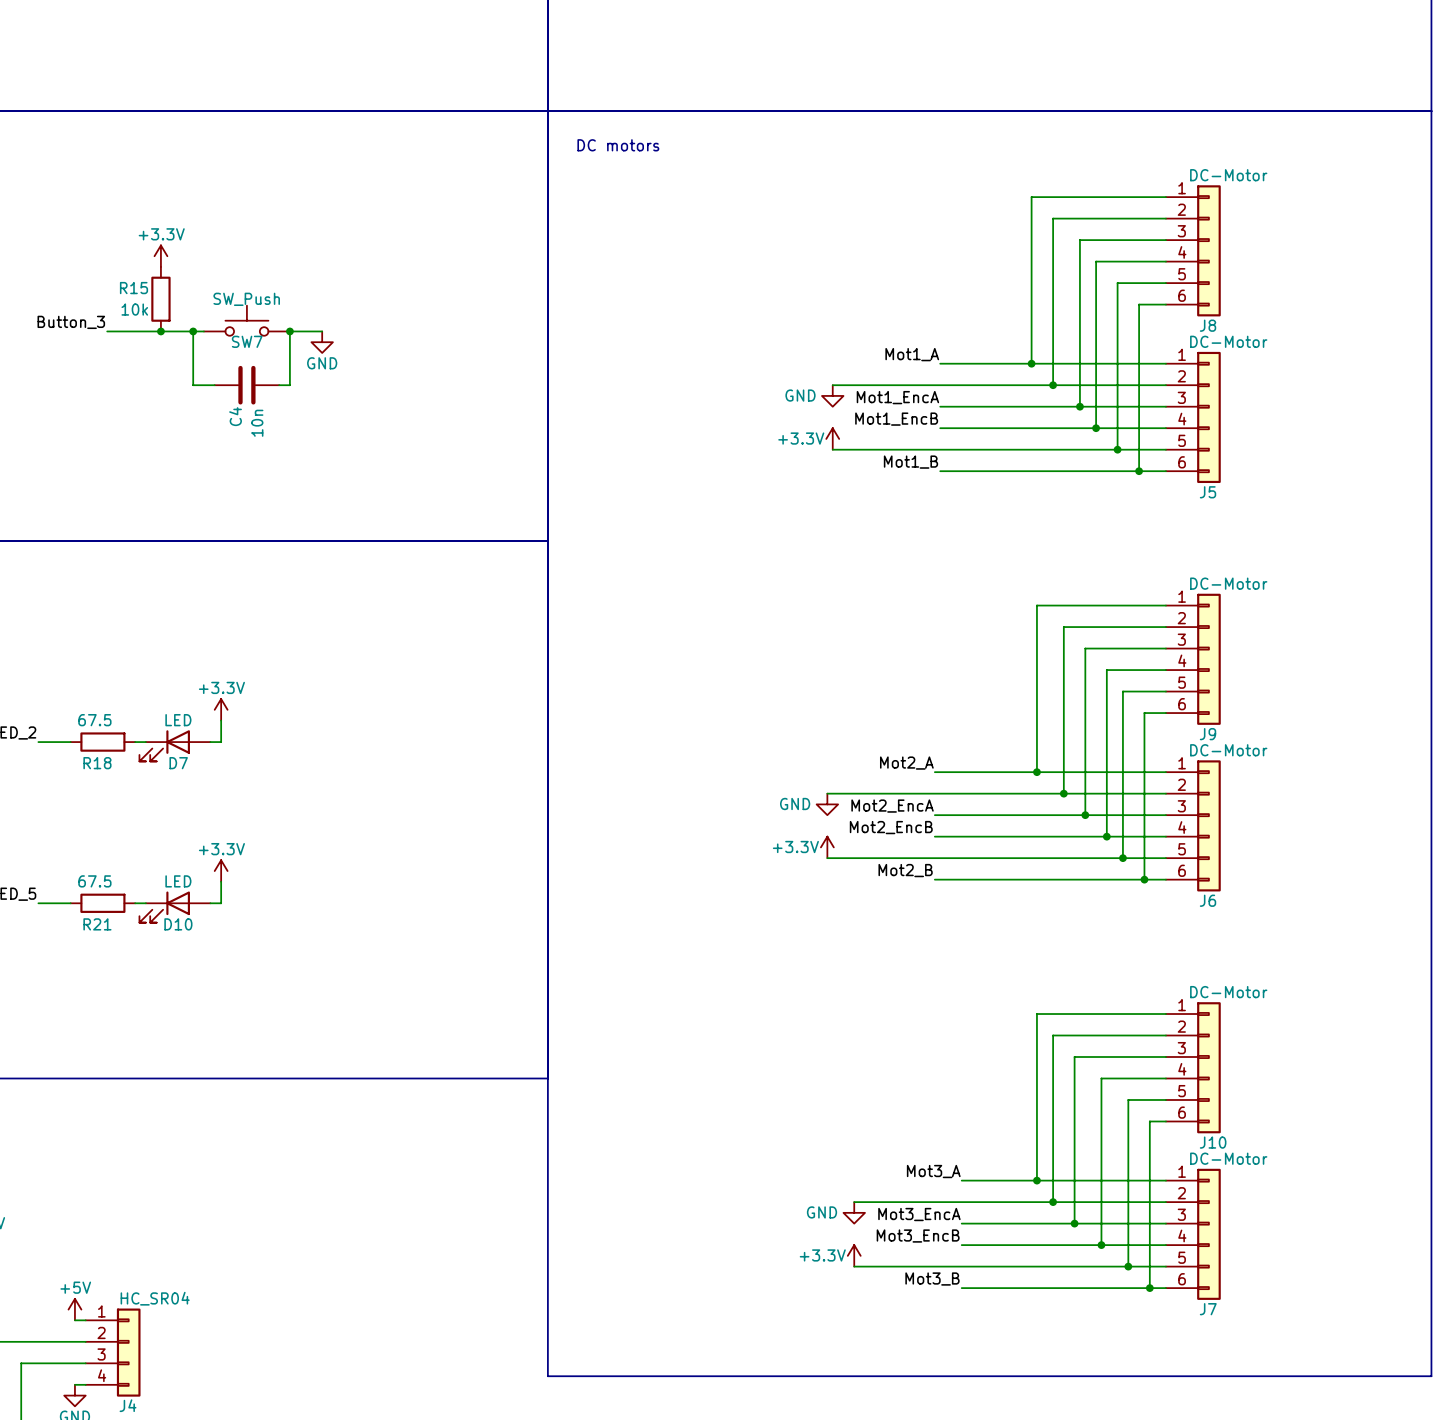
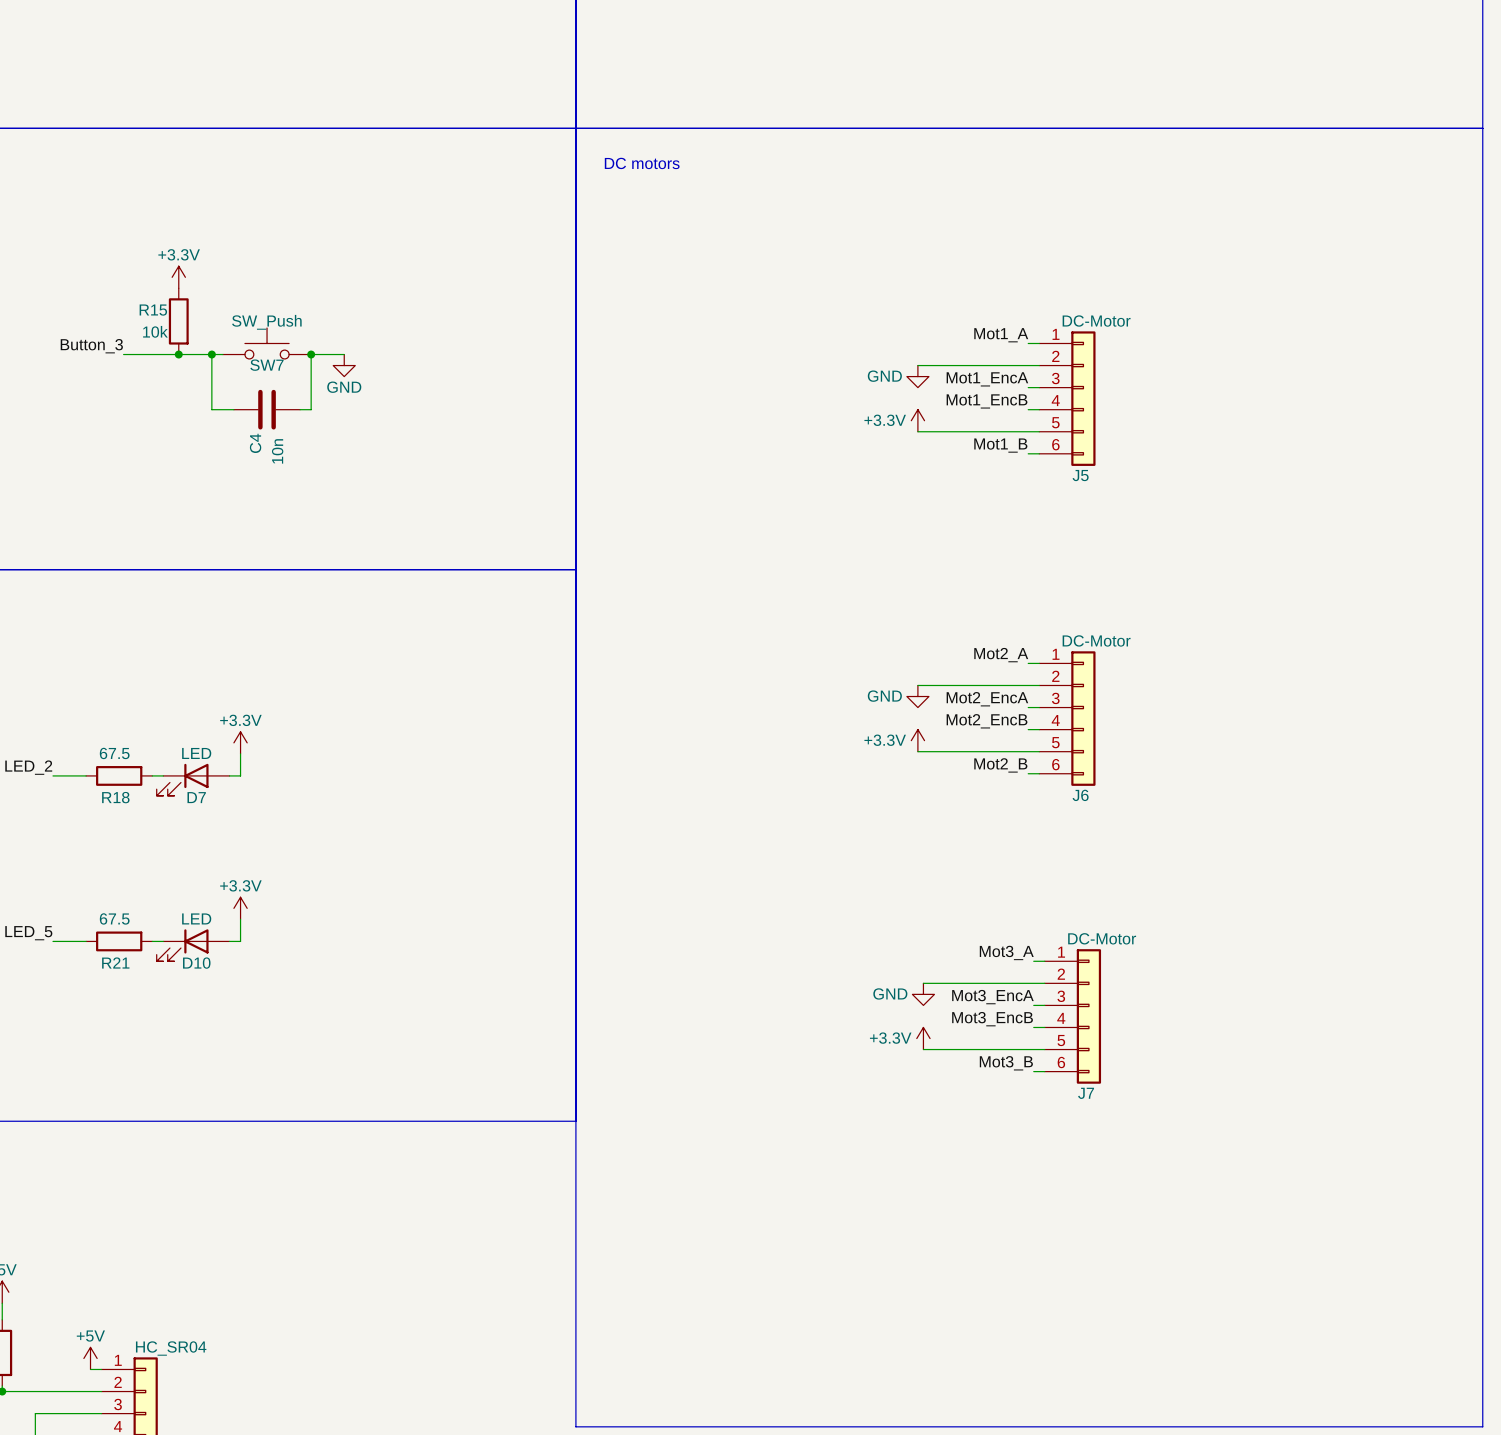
wire: (1165, 197) (1031, 197) (1031, 363) -> none
wire: (1165, 218) (1053, 218) (1053, 385) -> none
wire: (1165, 240) (1079, 240) (1079, 406) -> none
J8: DC-Motor (1193, 250) -> none
wire: (1165, 261) (1096, 261) (1096, 428) -> none
wire: (1165, 283) (1117, 283) (1117, 449) -> none
wire: (1165, 304) (1139, 304) (1139, 471) -> none
wire: none -> (1028, 343) (1039, 343)
wire: none -> (917, 365) (1039, 365)
label position: Mot1_A (912, 354) -> Mot1_A (1001, 335)
wire: (940, 363) (988, 363) -> none
wire: (999, 363) (1165, 363) -> none
junction: (1031, 363) -> none
wire: (832, 385) (988, 385) -> none
wire: (999, 385) (1165, 385) -> none
junction: (1053, 385) -> none
power symbol position: GND (832, 395) -> GND (917, 376)
label position: Mot1_EncA (897, 397) -> Mot1_EncA (987, 379)
wire: none -> (917, 431) (978, 431)
wire: (999, 406) (1165, 406) -> none
junction: (1079, 406) -> none
J5 position: (1193, 417) -> (1067, 398)
label position: Mot1_EncB (896, 419) -> Mot1_EncB (987, 401)
wire: (940, 428) (988, 428) -> none
wire: (999, 428) (1165, 428) -> none
junction: (1096, 428) -> none
power symbol position: +3.3V (832, 438) -> +3.3V (917, 420)
wire: (832, 449) (1165, 449) -> none
junction: (1117, 449) -> none
label position: Mot1_B (910, 462) -> Mot1_B (1000, 445)
wire: (940, 471) (1165, 471) -> none
junction: (1139, 471) -> none
wire: (1165, 605) (1036, 605) (1036, 772) -> none
wire: (1165, 627) (1063, 627) (1063, 793) -> none
wire: none -> (1028, 663) (1039, 663)
wire: (1165, 648) (1085, 648) (1085, 815) -> none
wire: none -> (917, 685) (1039, 685)
J9: DC-Motor (1193, 659) -> none
power symbol: none -> GND (917, 696)
wire: (1165, 670) (1106, 670) (1106, 836) -> none
wire: none -> (1028, 707) (1039, 707)
wire: (1165, 691) (1122, 691) (1122, 858) -> none
wire: none -> (1028, 729) (1039, 729)
power symbol: none -> +3.3V (917, 740)
wire: (1165, 713) (1144, 713) (1144, 879) -> none
wire: none -> (917, 751) (1039, 751)
wire: none -> (1028, 773) (1039, 773)
label position: Mot2_A (906, 763) -> Mot2_A (1001, 655)
wire: (934, 772) (1165, 772) -> none
junction: (1036, 772) -> none
wire: (827, 793) (1165, 793) -> none
junction: (1063, 793) -> none
power symbol: GND (827, 804) -> none
label position: Mot2_EncA (892, 806) -> Mot2_EncA (987, 699)
wire: (934, 815) (1165, 815) -> none
junction: (1085, 815) -> none
J6 position: (1193, 825) -> (1067, 718)
label position: Mot2_EncB (891, 827) -> Mot2_EncB (987, 721)
wire: (934, 836) (1165, 836) -> none
junction: (1106, 836) -> none
power symbol: +3.3V (827, 847) -> none
wire: (827, 858) (1165, 858) -> none
junction: (1122, 858) -> none
label position: Mot2_B (905, 870) -> Mot2_B (1000, 765)
wire: (934, 879) (1165, 879) -> none
junction: (1144, 879) -> none
label: none -> Mot3_A (1006, 952)
wire: none -> (1033, 961) (1044, 961)
wire: none -> (923, 983) (1044, 983)
power symbol: none -> GND (923, 994)
label: none -> Mot3_EncA (992, 997)
wire: none -> (1033, 1005) (1044, 1005)
label: none -> Mot3_EncB (992, 1019)
wire: none -> (1033, 1027) (1044, 1027)
power symbol: none -> +3.3V (923, 1038)
wire: none -> (923, 1049) (1044, 1049)
wire: (1165, 1014) (1036, 1014) (1036, 1180) -> none
label: none -> Mot3_B (1006, 1063)
wire: none -> (1033, 1071) (1044, 1071)
wire: (1165, 1035) (1053, 1035) (1053, 1202) -> none
wire: (1165, 1056) (1074, 1056) (1074, 1223) -> none
J10: DC-Motor (1193, 1067) -> none
wire: (1165, 1078) (1101, 1078) (1101, 1245) -> none
wire: (1165, 1099) (1128, 1099) (1128, 1266) -> none
wire: (1165, 1121) (1149, 1121) (1149, 1288) -> none
label: Mot3_A (933, 1171) -> none
wire: (961, 1180) (1165, 1180) -> none
junction: (1036, 1180) -> none
wire: (854, 1202) (1165, 1202) -> none
junction: (1053, 1202) -> none
power symbol: GND (854, 1212) -> none
label: Mot3_EncA (919, 1214) -> none
wire: (961, 1223) (1165, 1223) -> none
junction: (1074, 1223) -> none
J7 position: (1193, 1234) -> (1072, 1016)
label: Mot3_EncB (918, 1236) -> none
wire: (961, 1245) (1165, 1245) -> none
junction: (1101, 1245) -> none
power symbol: +3.3V (854, 1255) -> none
wire: (854, 1266) (1165, 1266) -> none
junction: (1128, 1266) -> none
label: Mot3_B (932, 1279) -> none
wire: (961, 1288) (1165, 1288) -> none
junction: (1149, 1288) -> none

